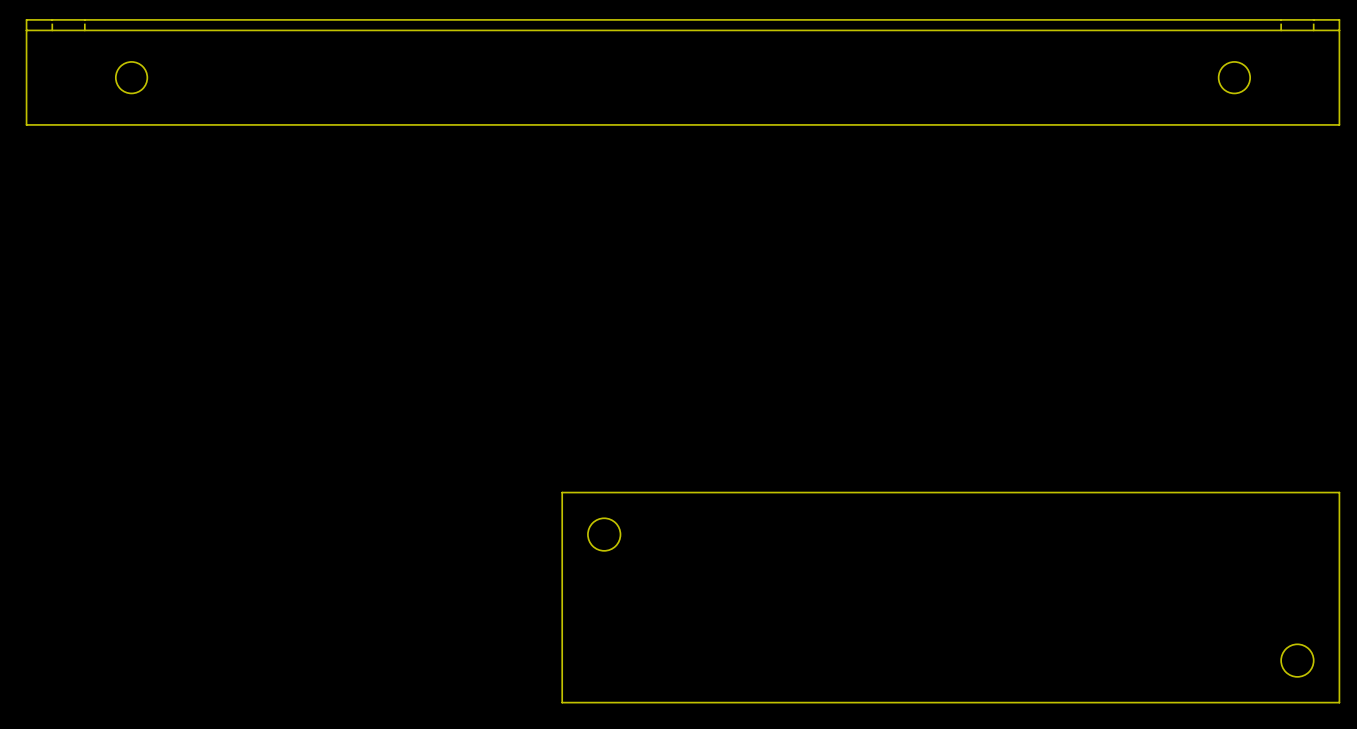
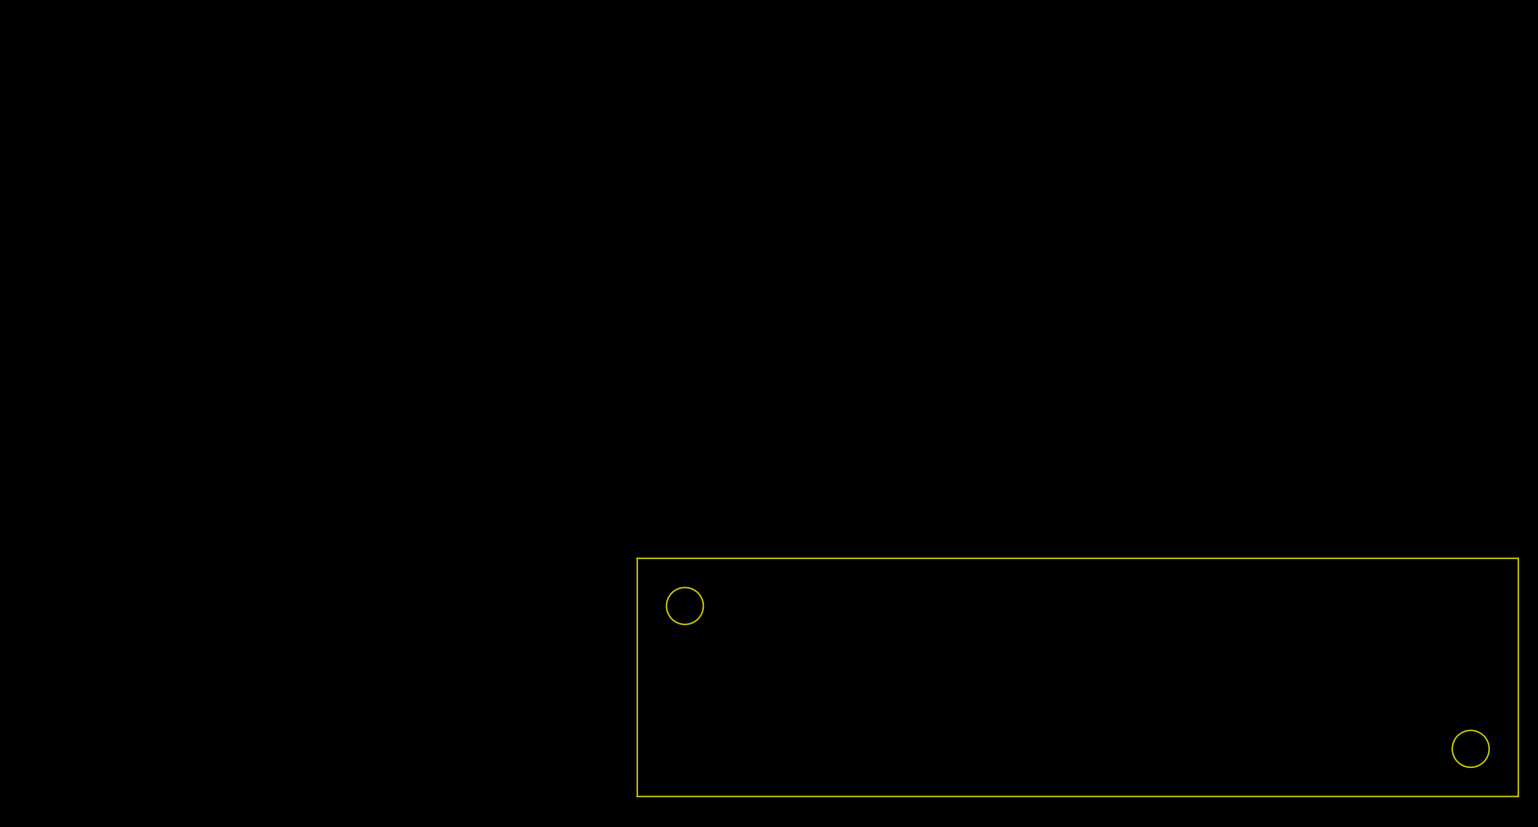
board edge: (52, 19) (52, 30) -> none
board edge: (84, 19) (84, 30) -> none
board edge: (1281, 19) (1281, 30) -> none
board edge: (1313, 19) (1313, 30) -> none
board edge: (1339, 19) (26, 19) (26, 124) (1339, 124) (1339, 19) -> none
board edge: (1339, 30) (26, 30) -> none
round board edge: [115, 61, 148, 94] -> none
round board edge: [1218, 61, 1251, 94] -> none

